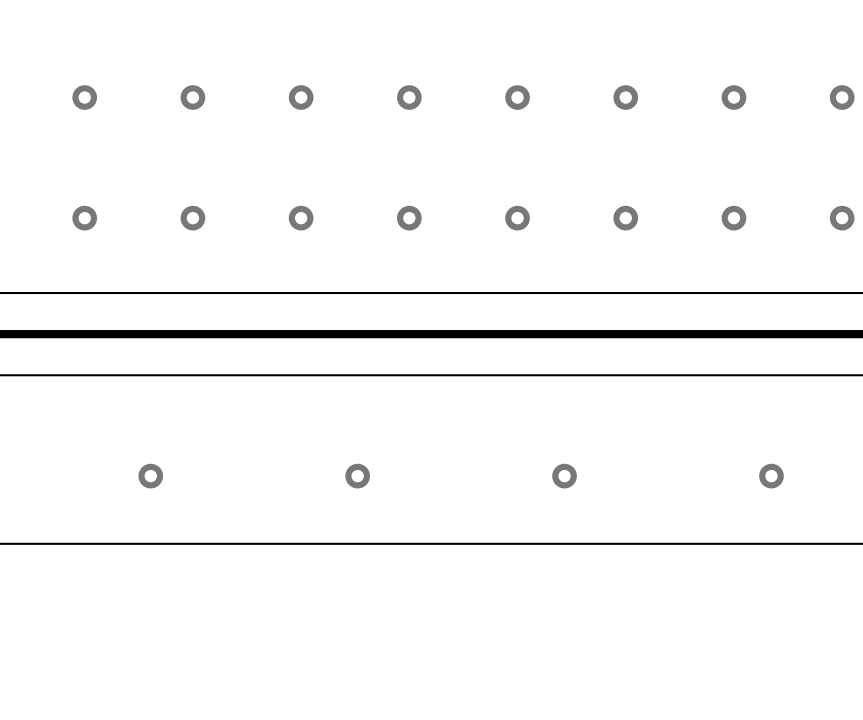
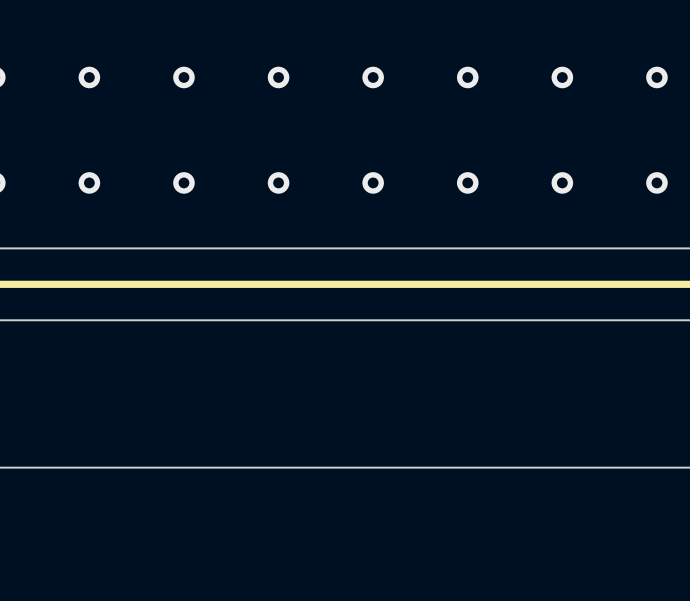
via: (150, 476) -> none
via: (357, 476) -> none
via: (564, 476) -> none
via: (771, 476) -> none

